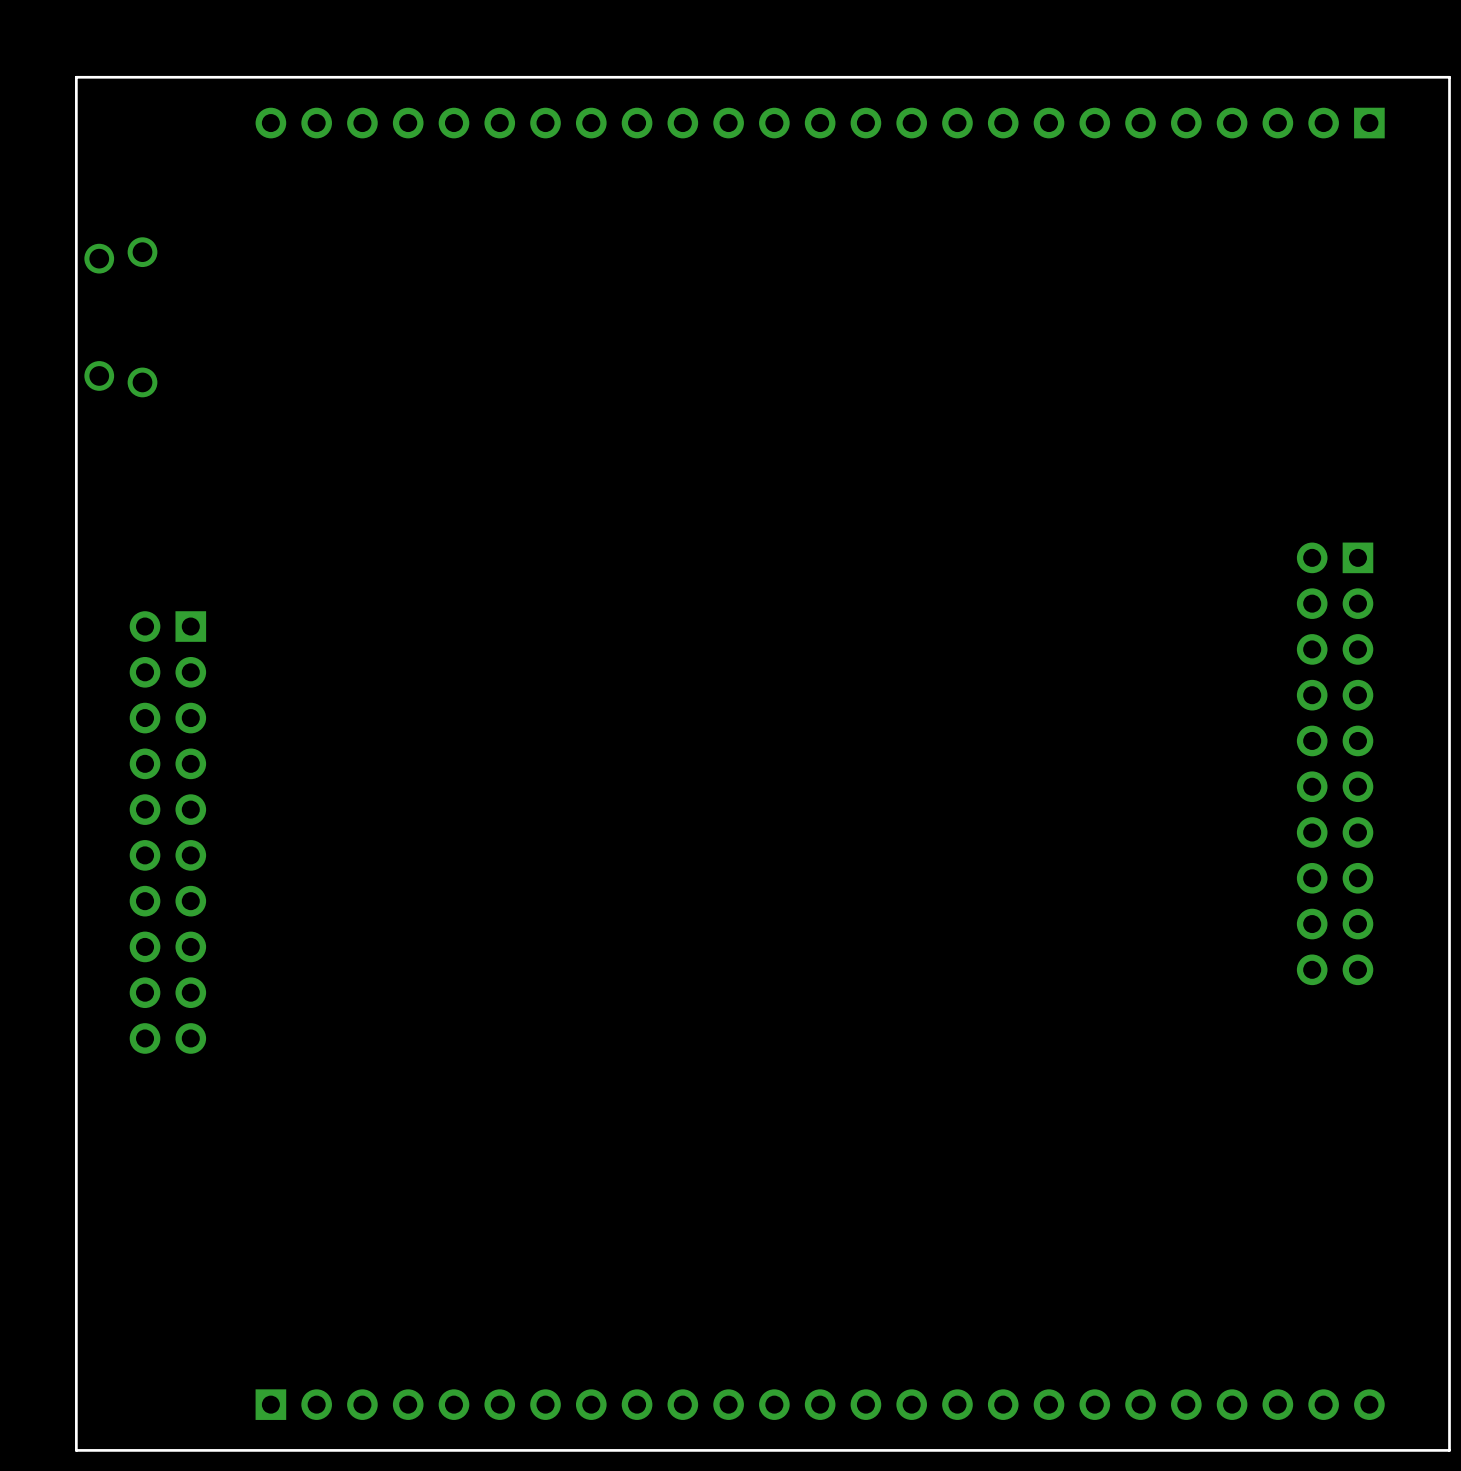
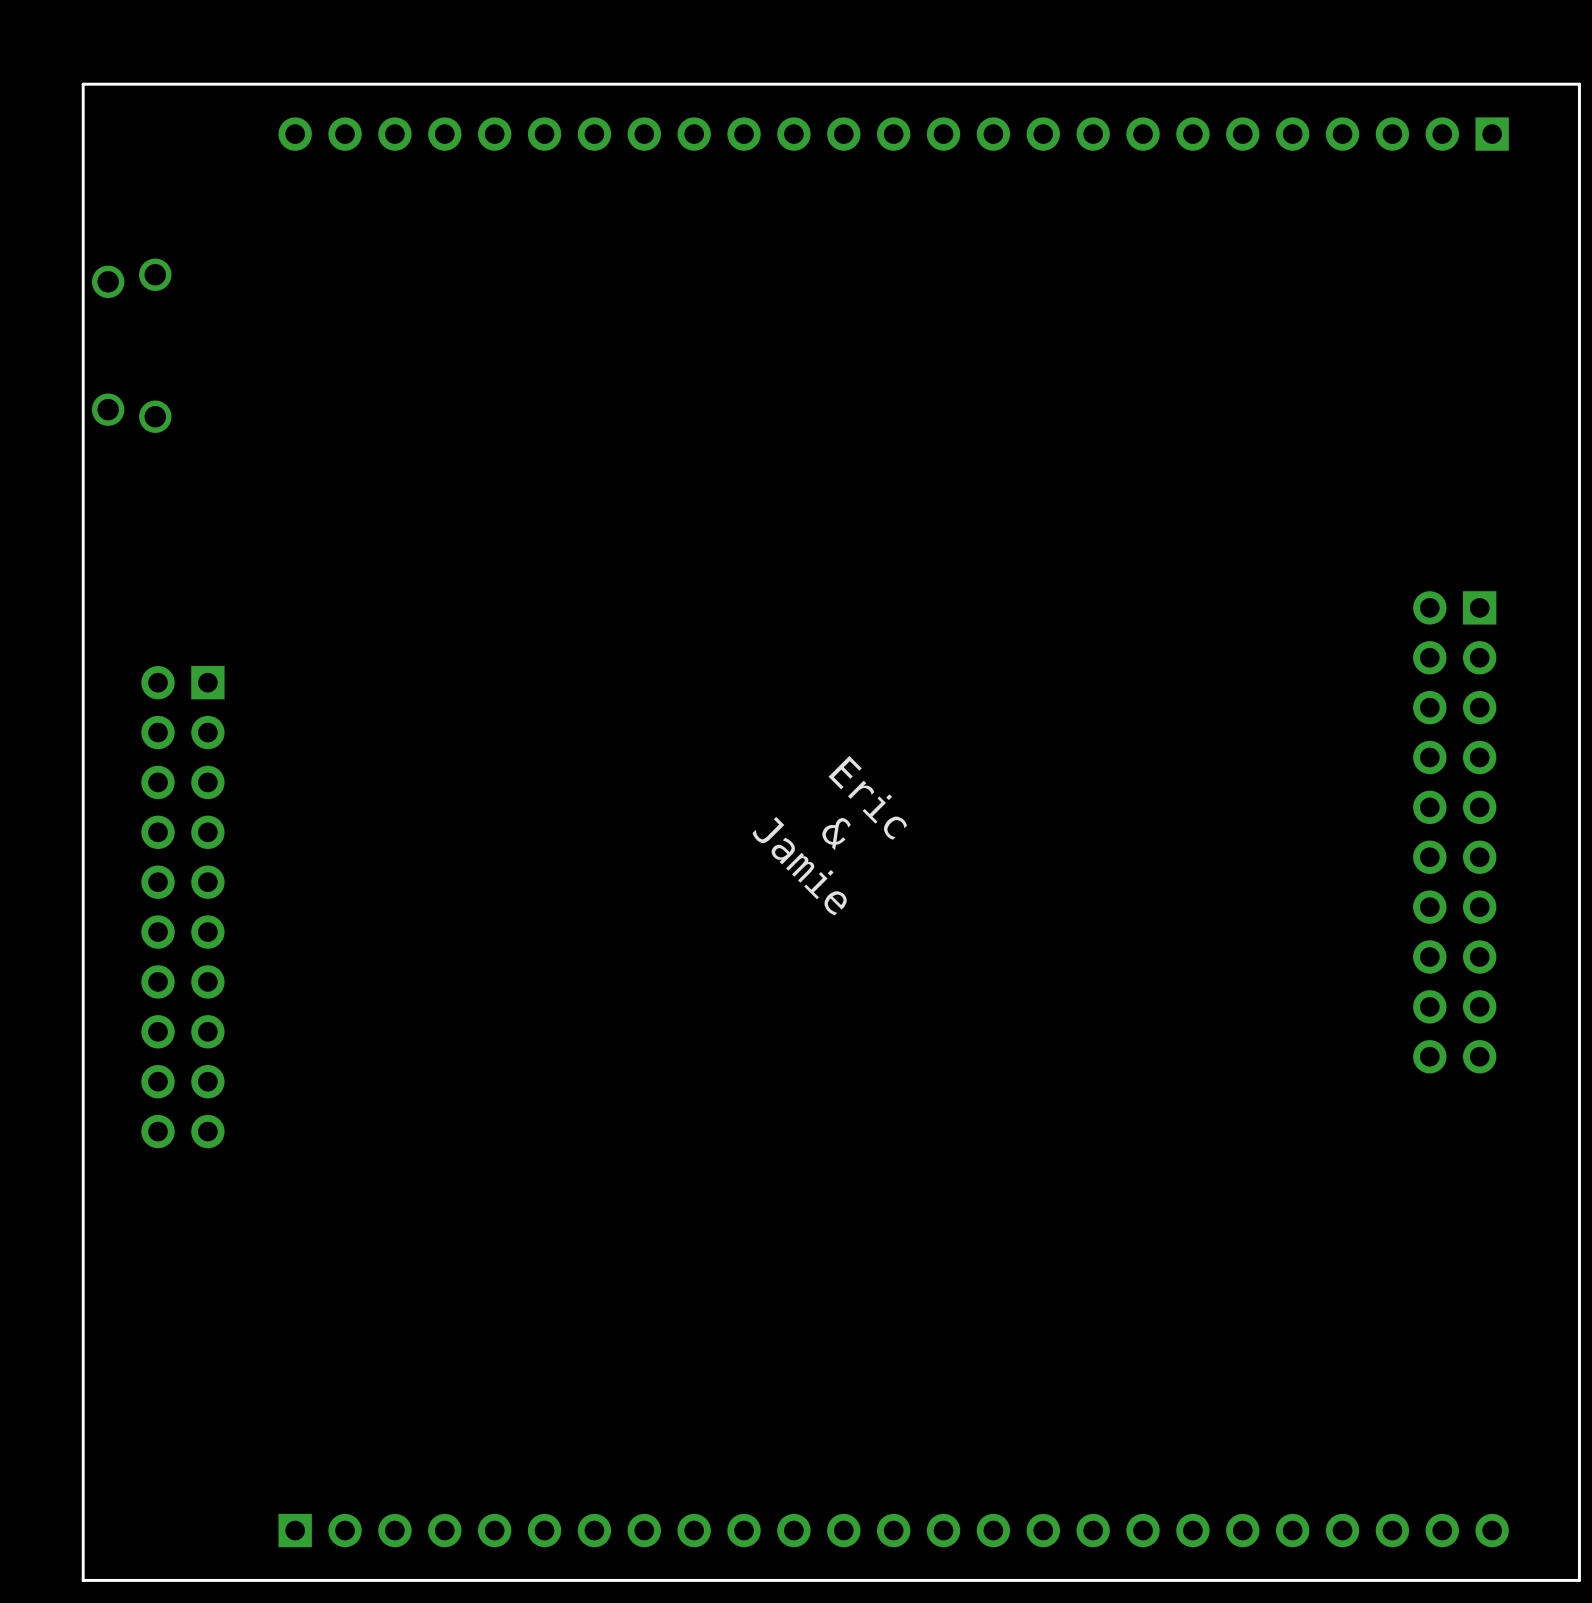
text: none -> Eric (867, 797)
text: none -> & (836, 834)
text: none -> Jamie (799, 866)

